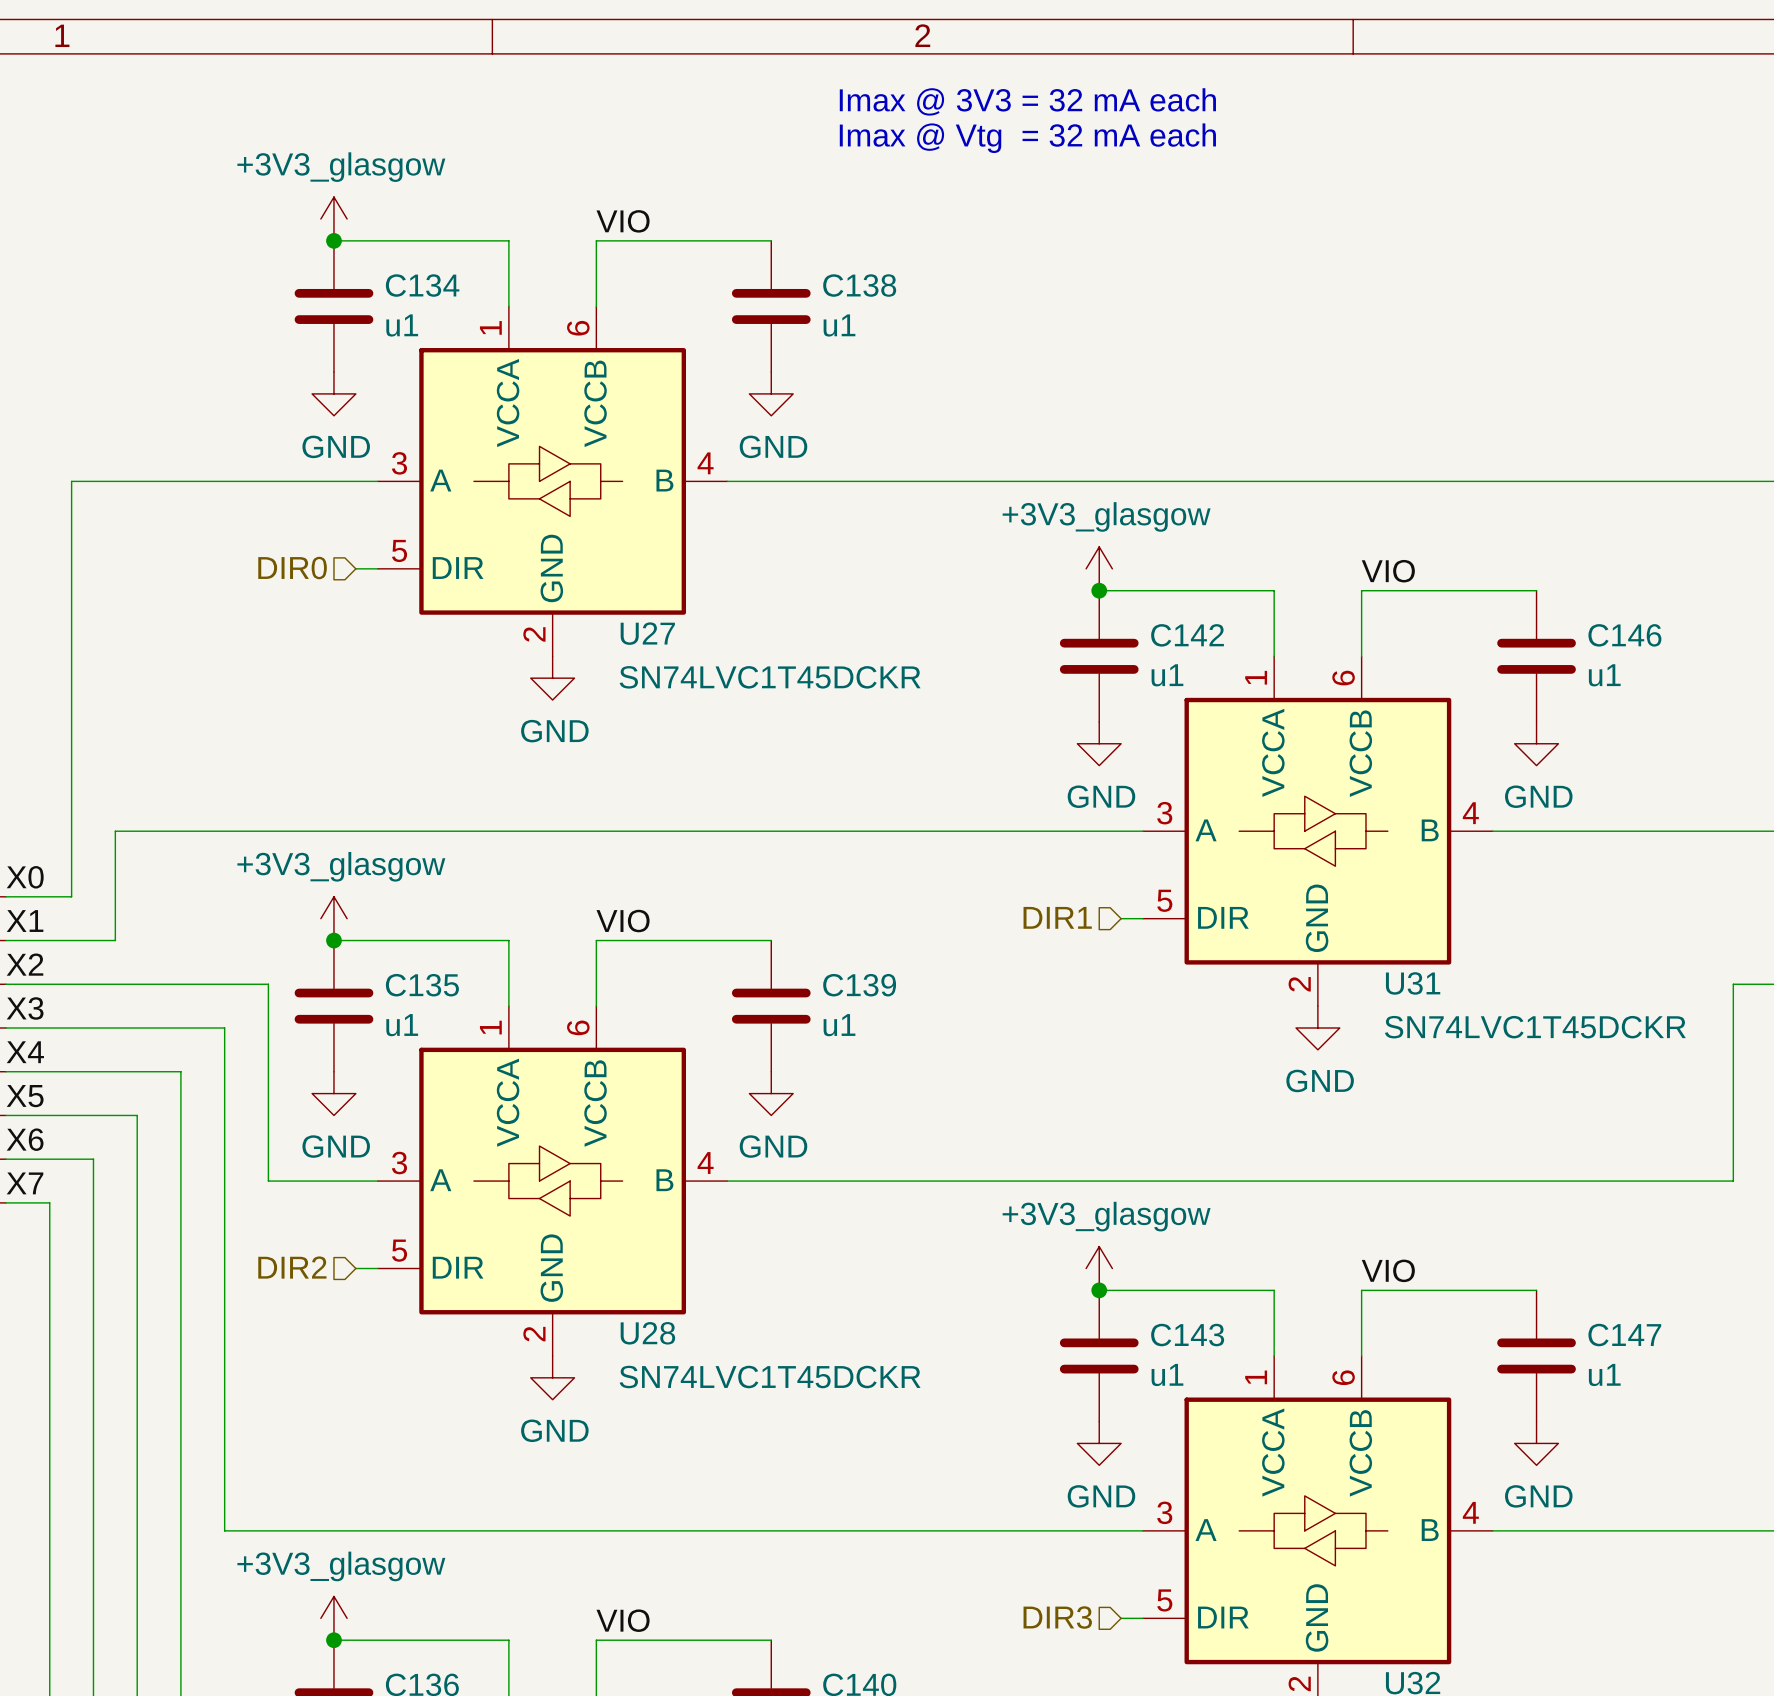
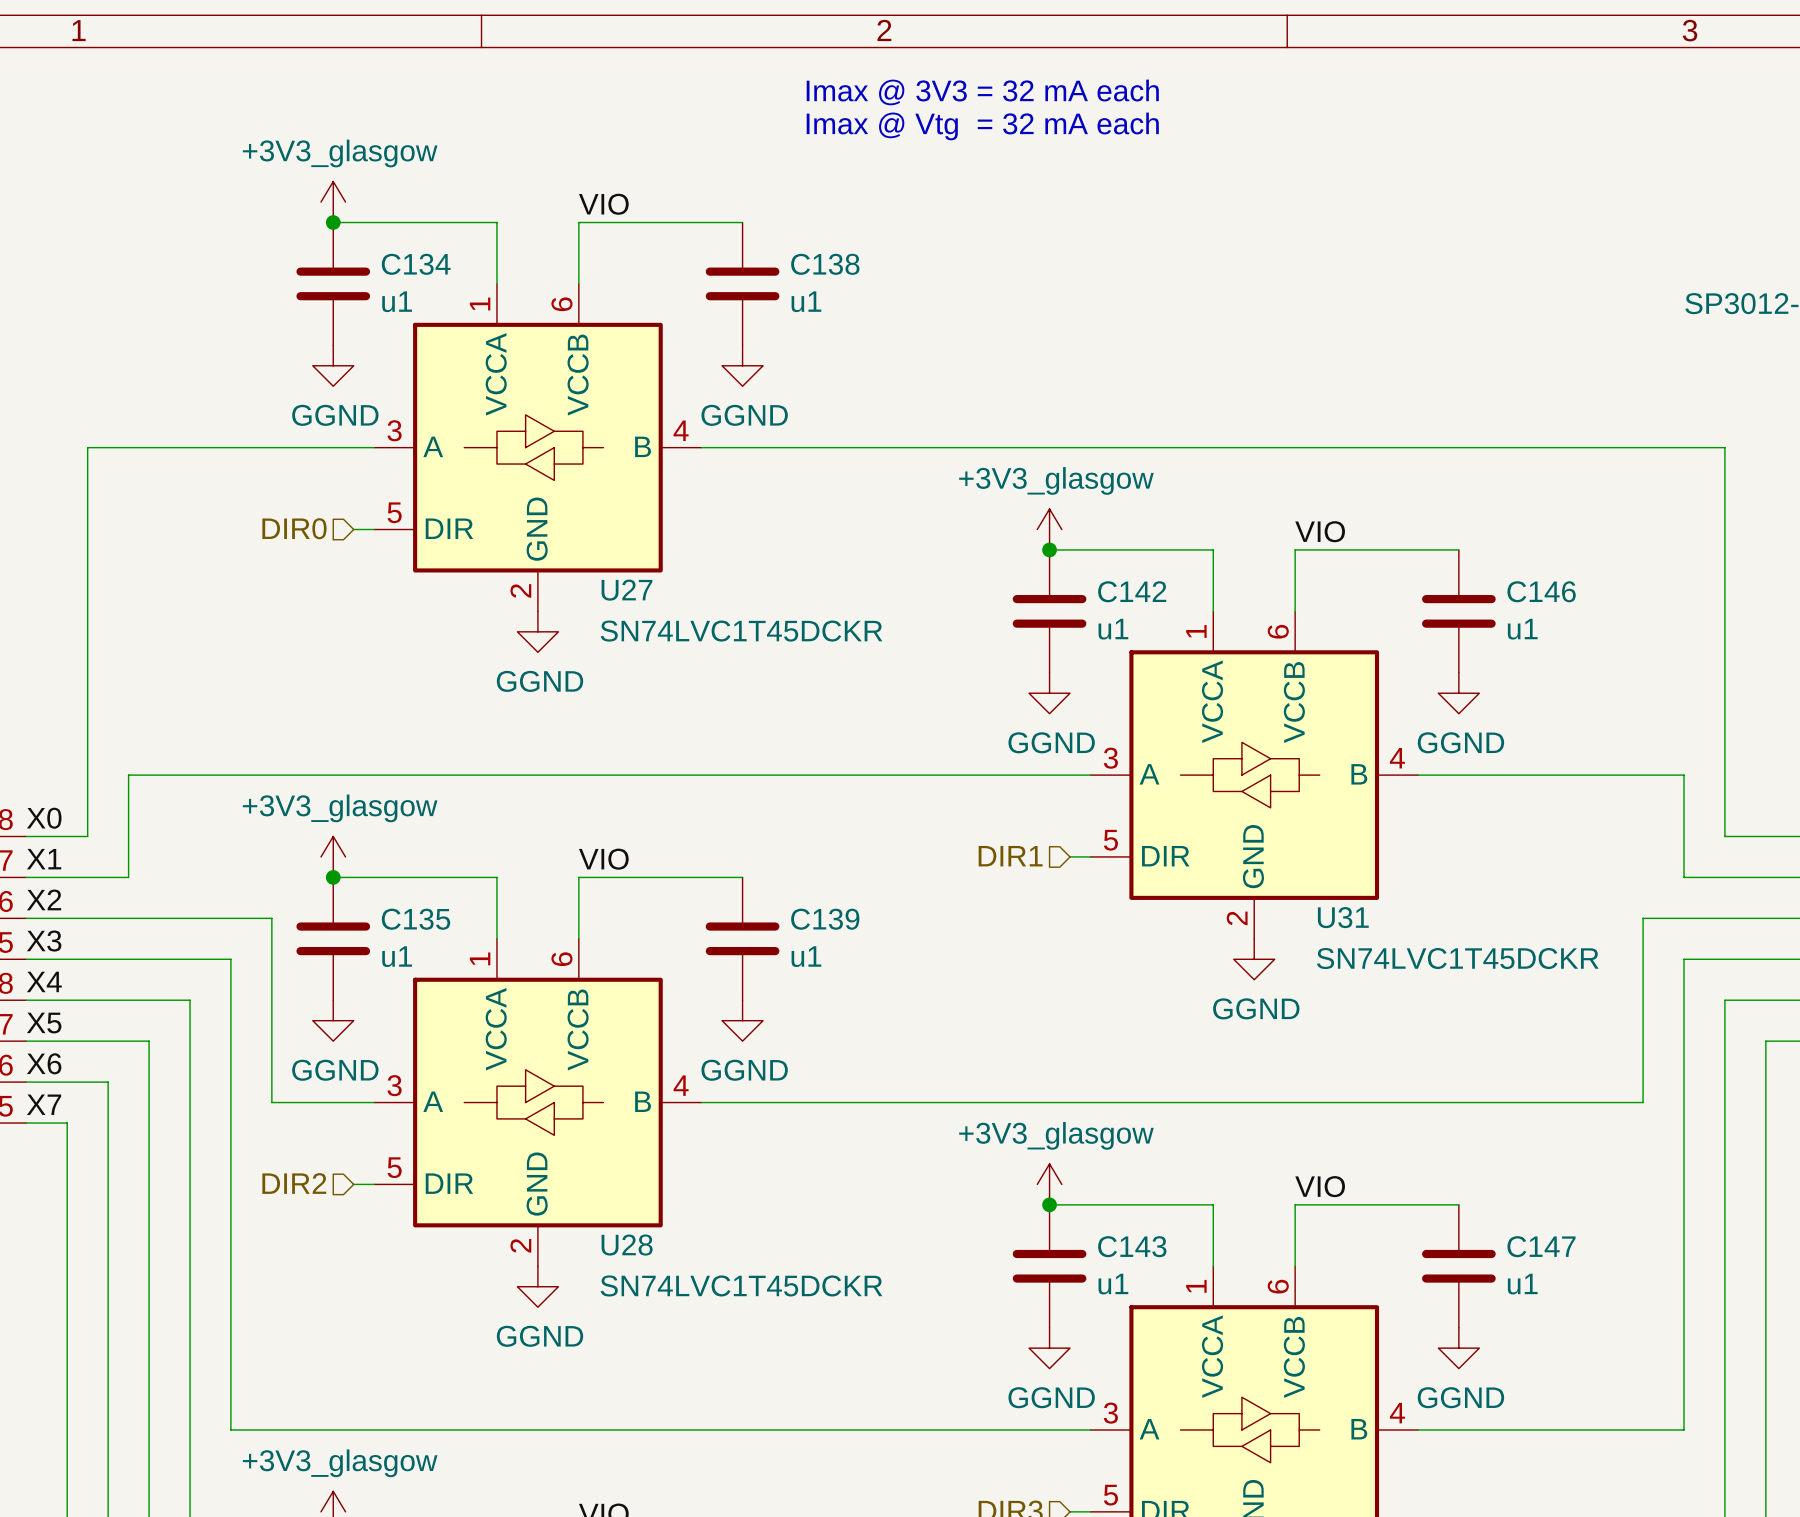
power symbol: GND (333, 393) -> GGND (333, 365)
power symbol: GND (771, 393) -> GGND (742, 365)
power symbol: GND (552, 678) -> GGND (537, 631)
power symbol: GND (1099, 743) -> GGND (1049, 693)
power symbol: GND (1536, 743) -> GGND (1458, 693)
power symbol: GND (1317, 1028) -> GGND (1254, 959)
power symbol: GND (333, 1093) -> GGND (333, 1020)
power symbol: GND (771, 1093) -> GGND (742, 1020)
power symbol: GND (552, 1377) -> GGND (537, 1286)
power symbol: GND (1099, 1443) -> GGND (1049, 1348)
power symbol: GND (1536, 1443) -> GGND (1458, 1348)

